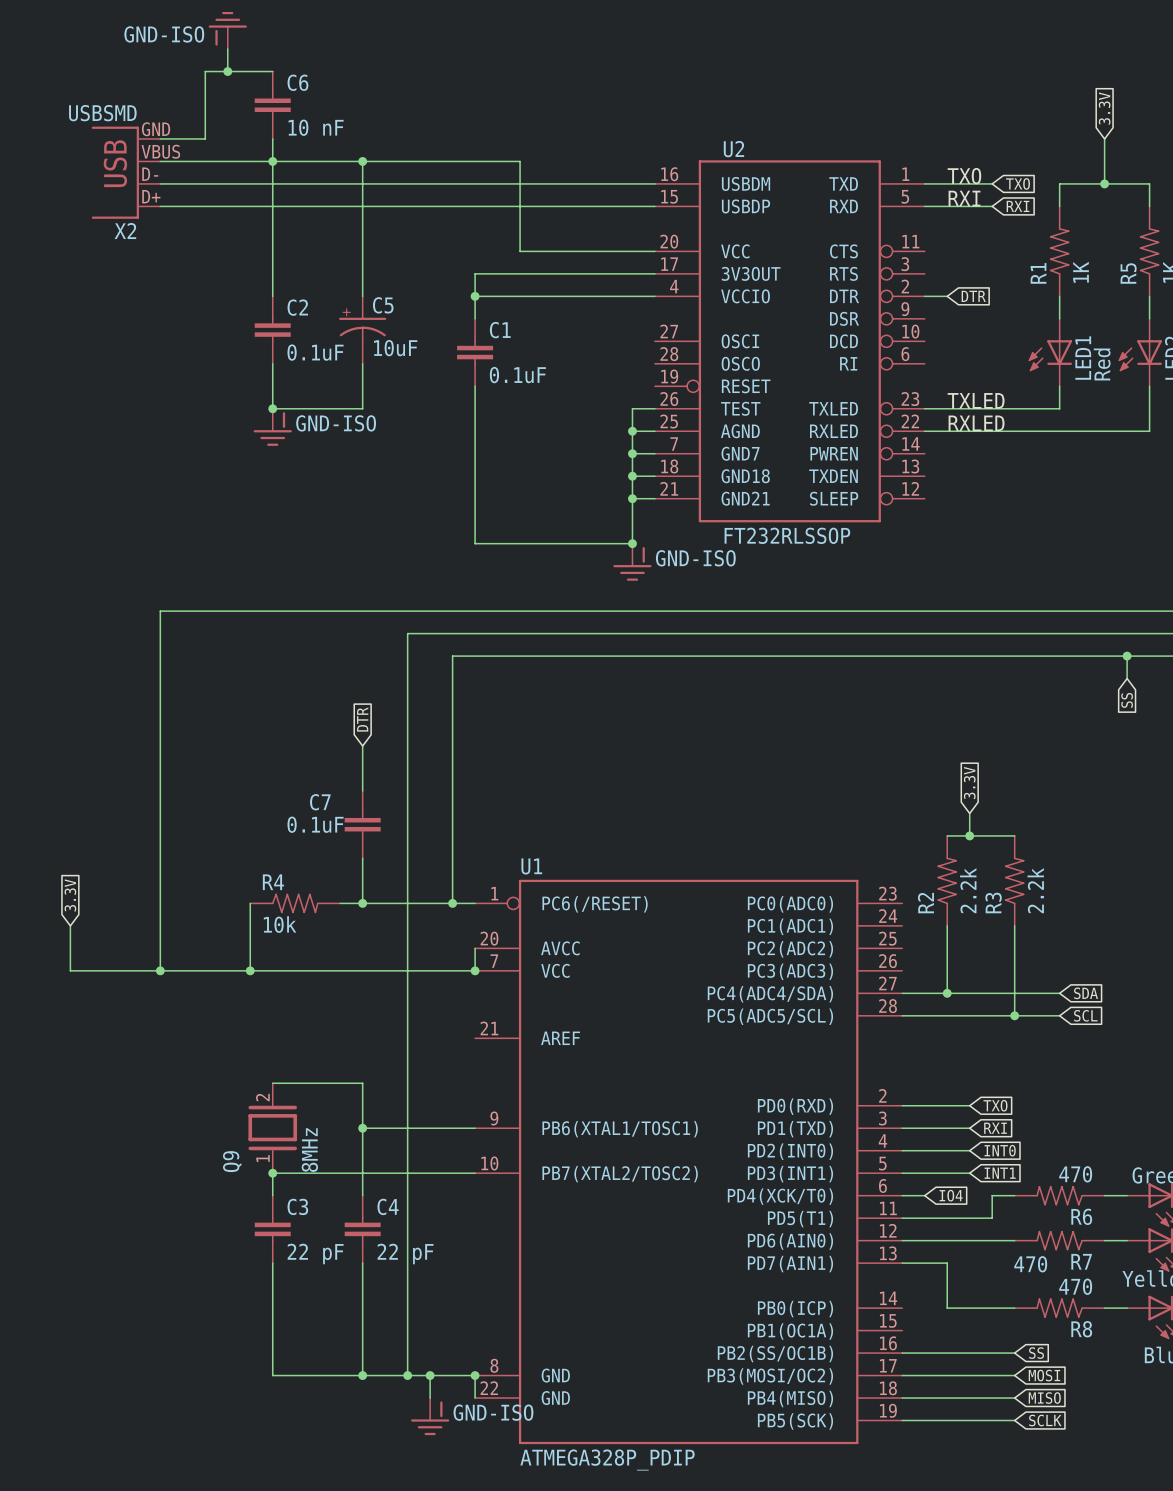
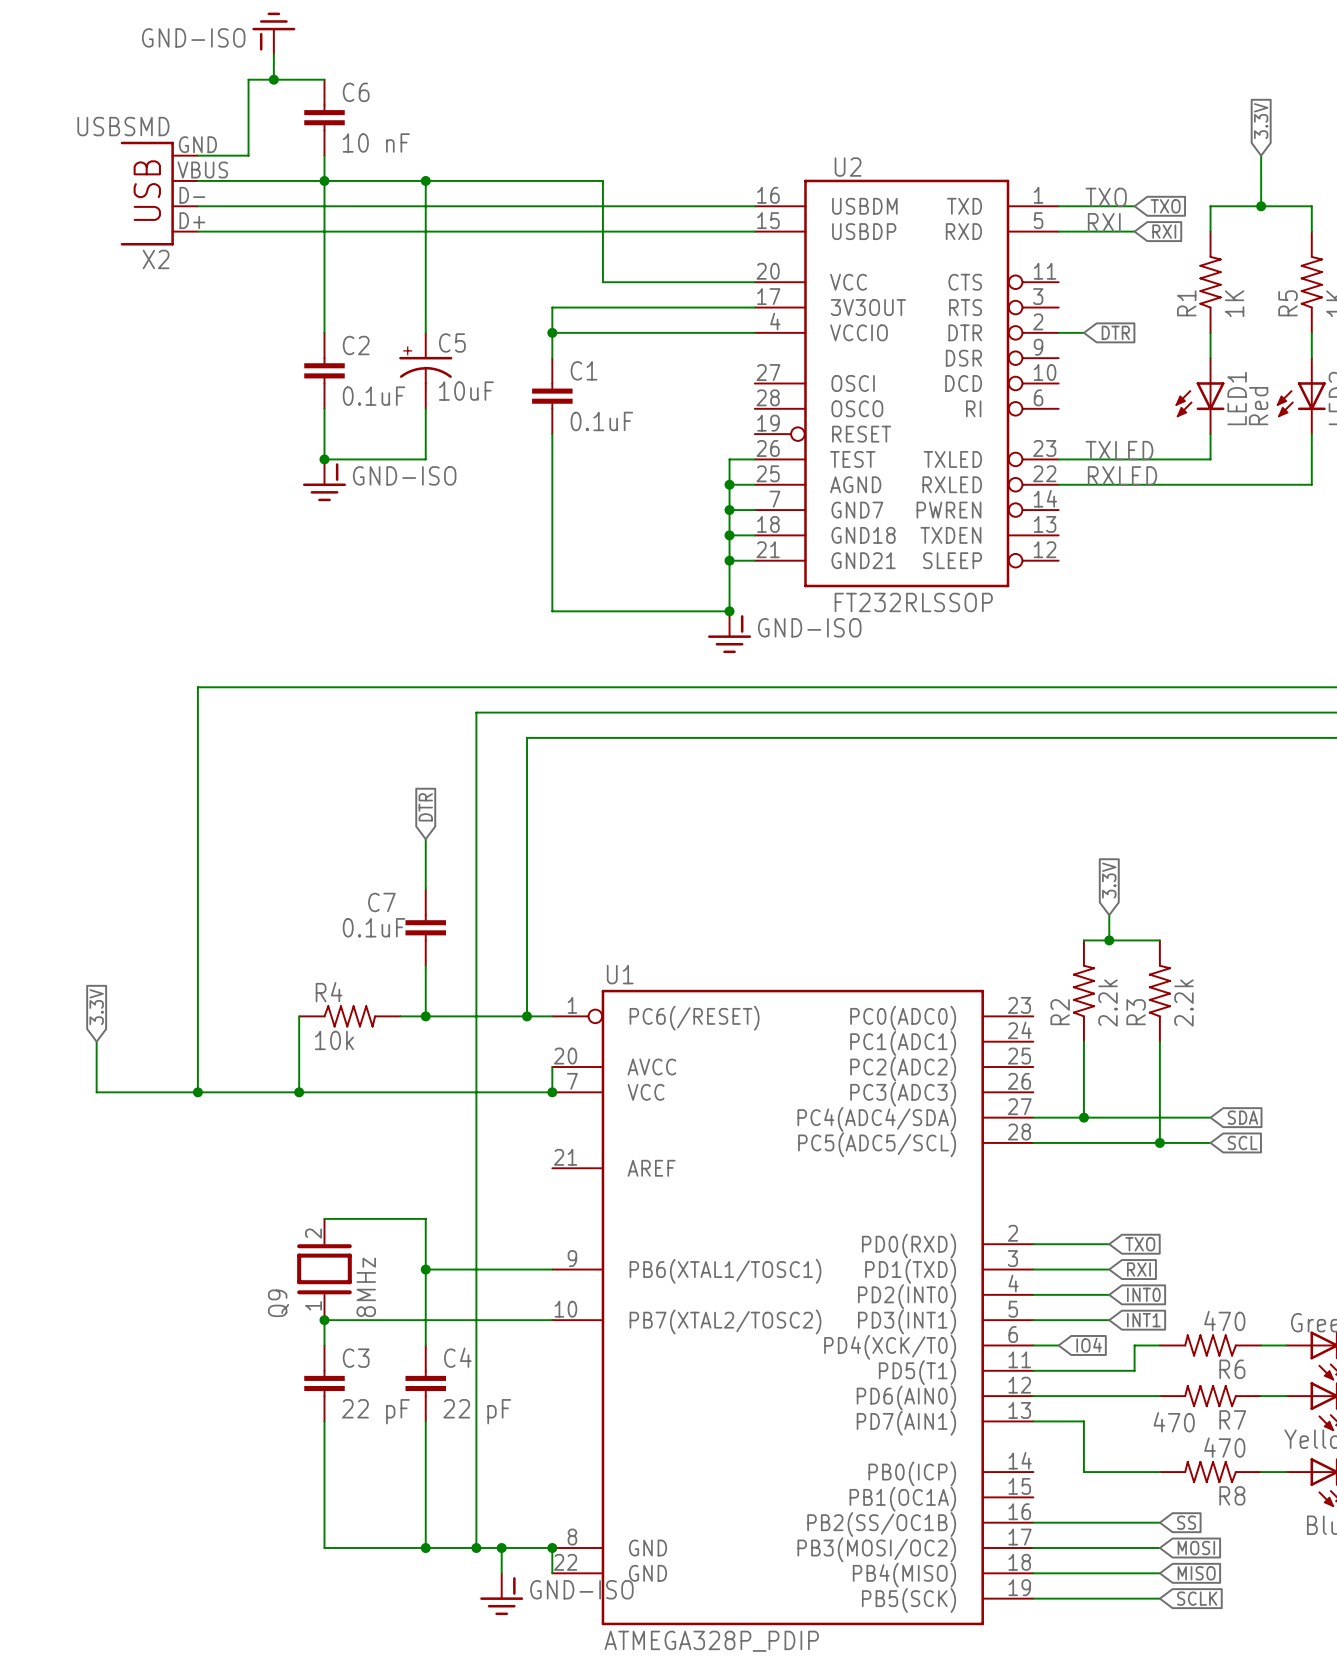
wire: (1127, 656) (1127, 678) -> none
junction: (1127, 656) -> none
global label: SS (1127, 700) -> none

